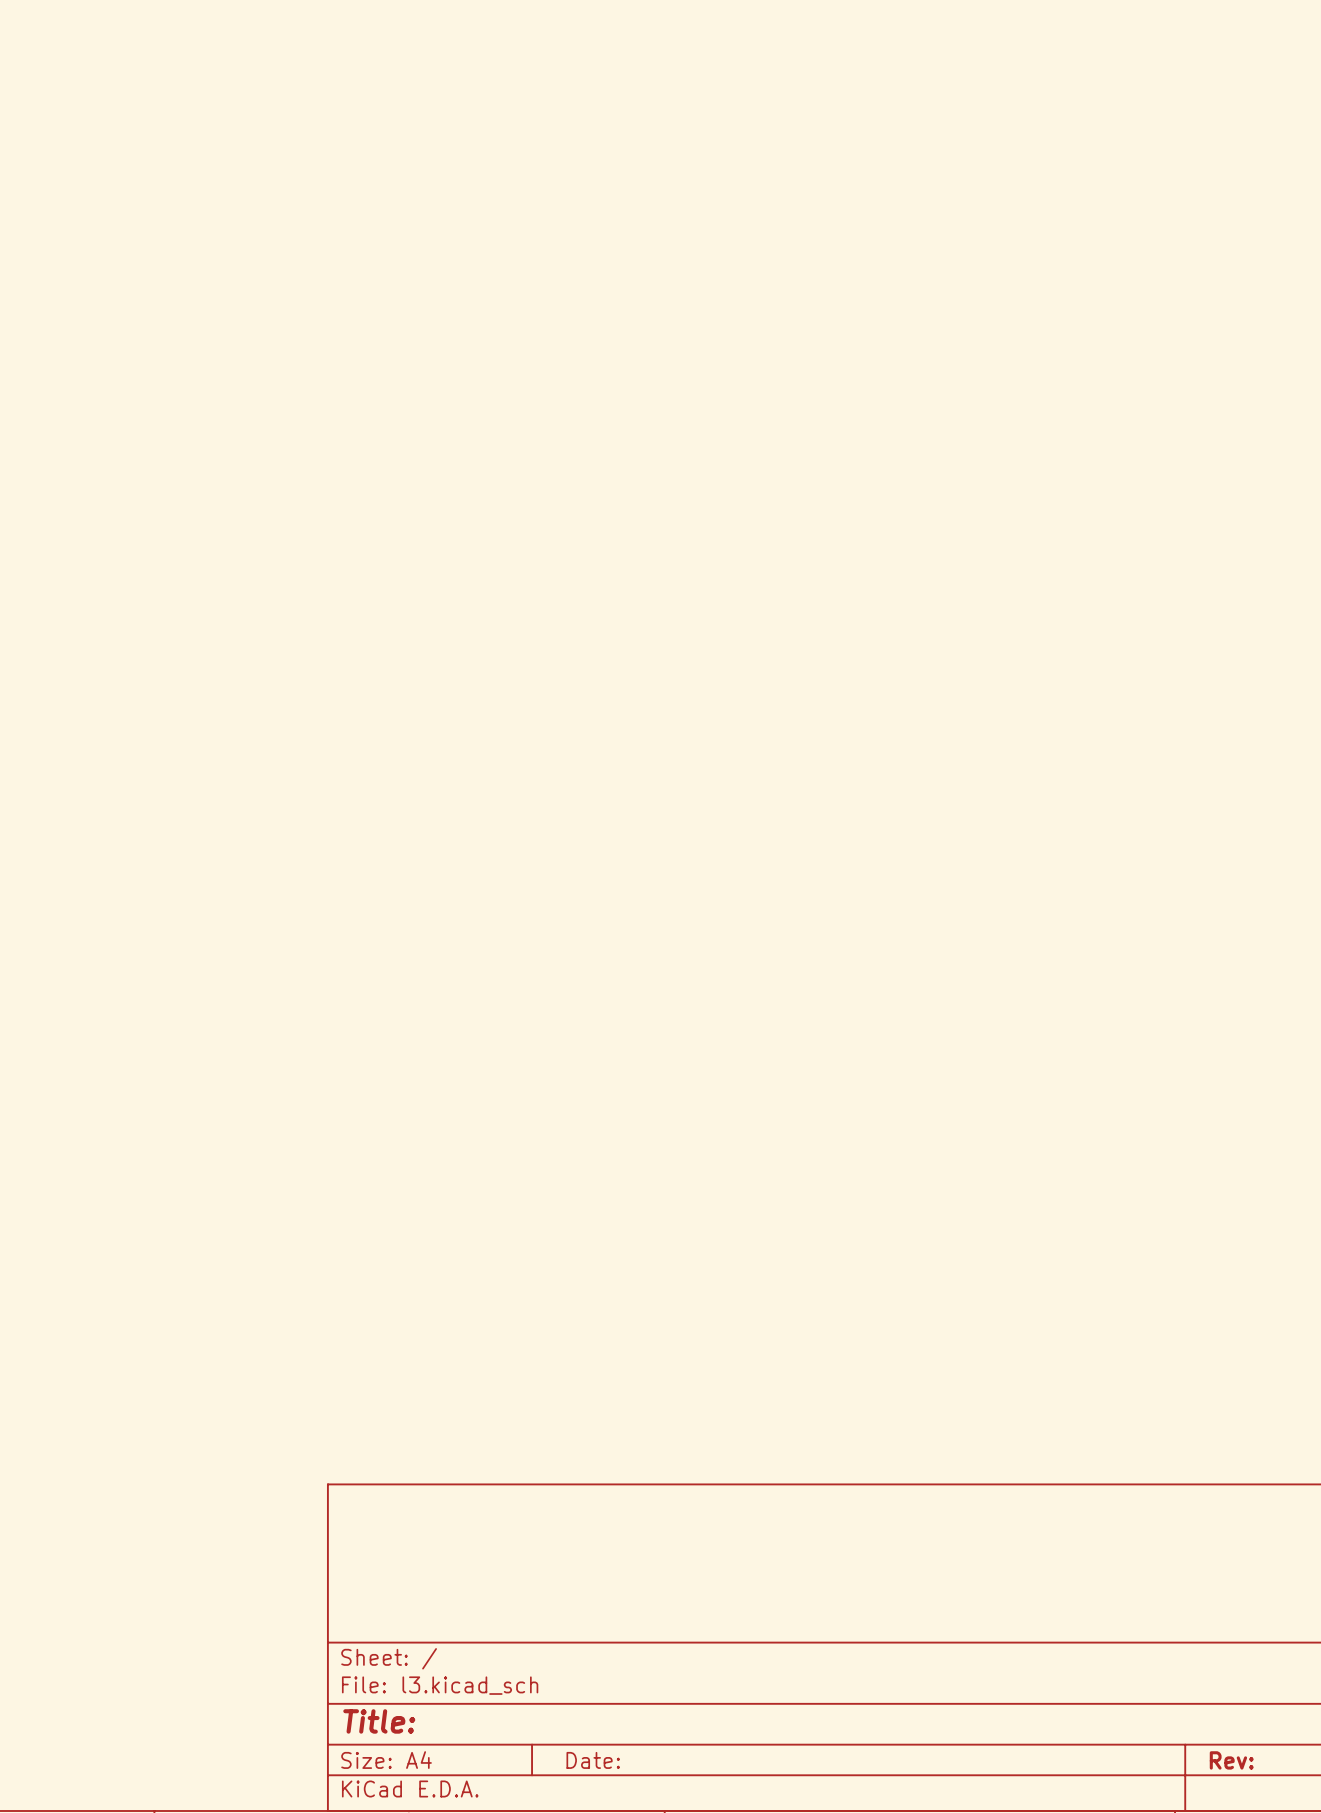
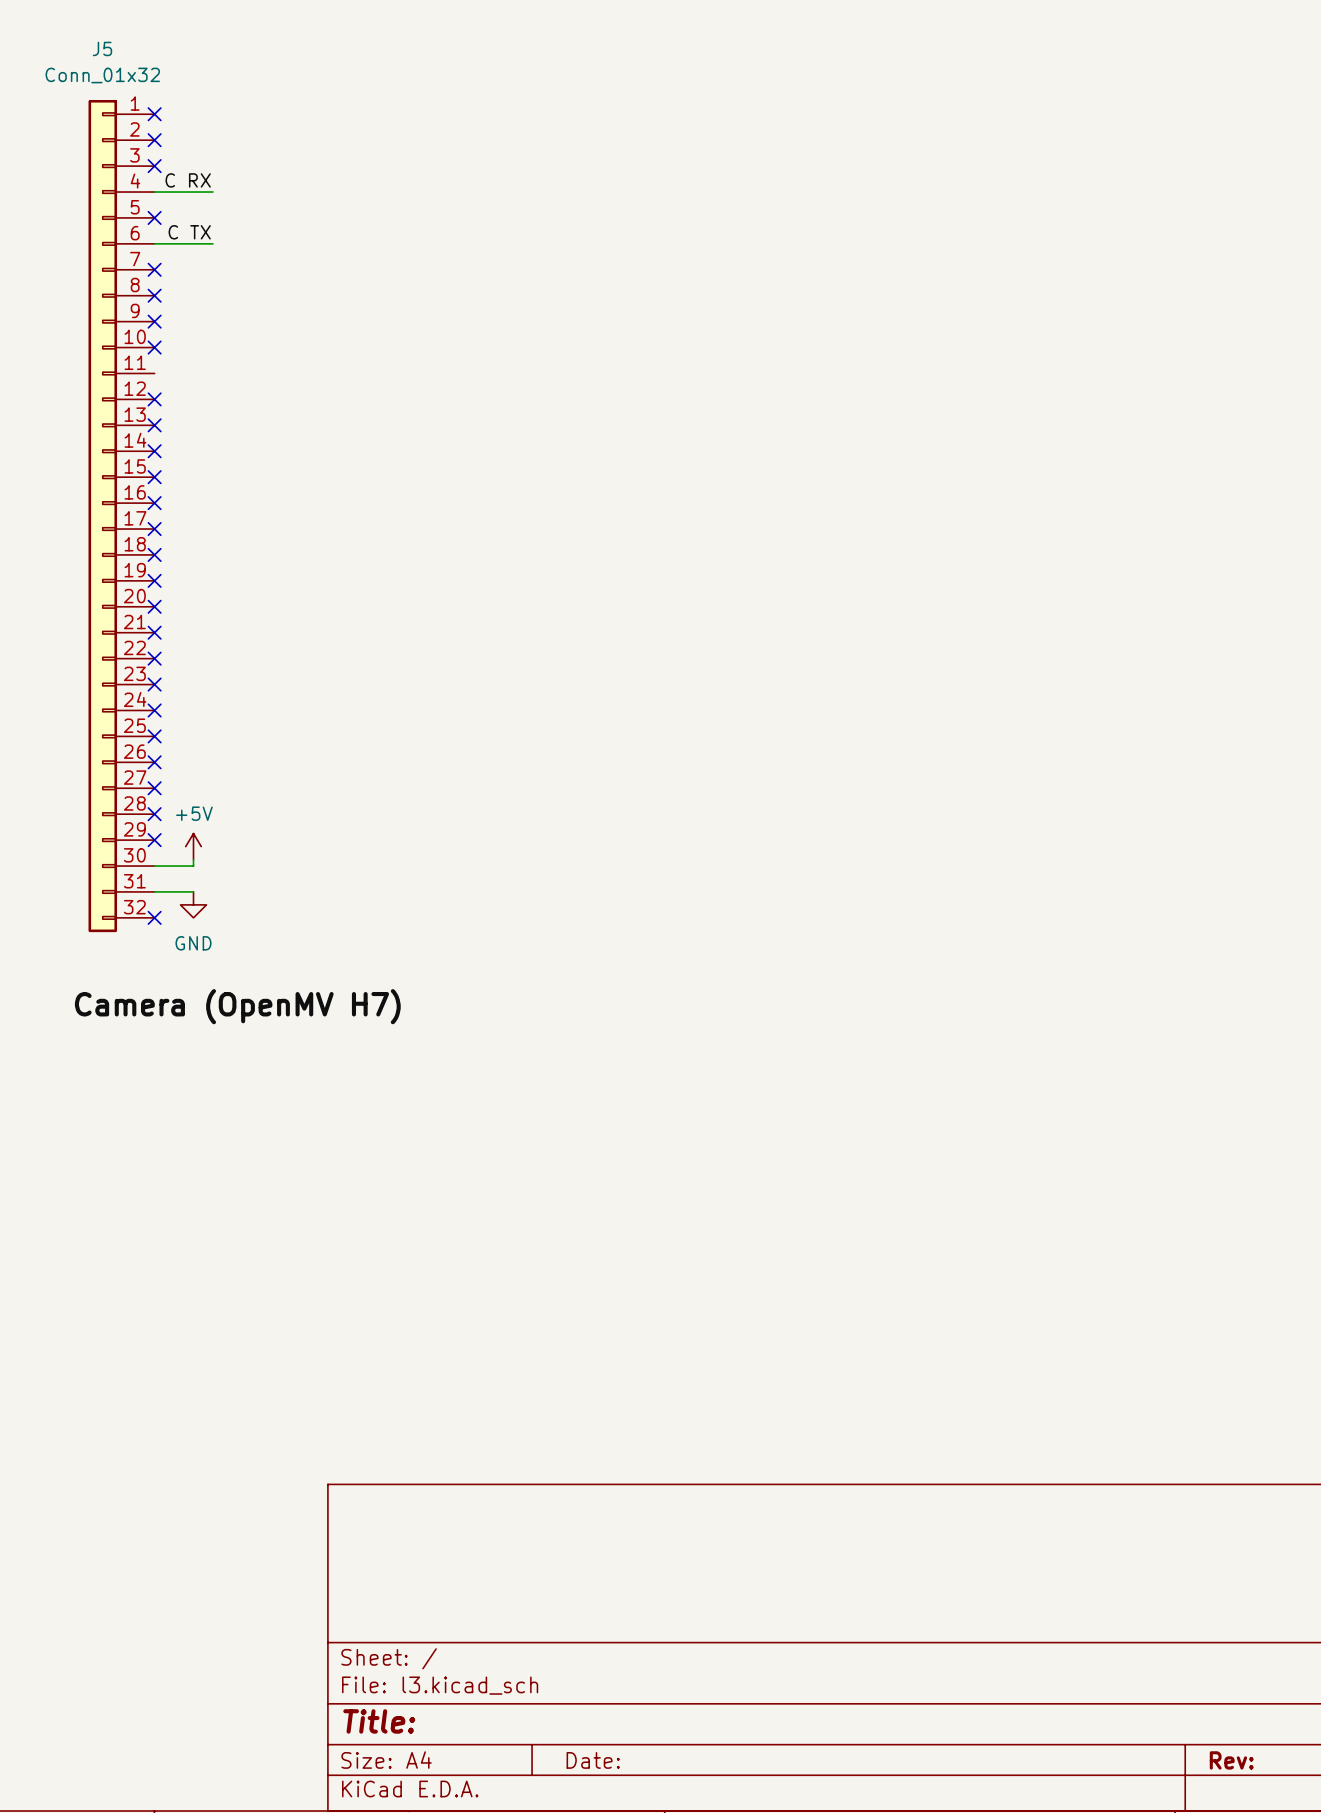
no-connect mark: none -> (154, 114)
no-connect mark: none -> (154, 140)
no-connect mark: none -> (154, 166)
label: none -> C RX (188, 180)
wire: none -> (154, 192) (212, 192)
no-connect mark: none -> (154, 217)
label: none -> C TX (189, 232)
wire: none -> (154, 243) (212, 243)
no-connect mark: none -> (154, 269)
no-connect mark: none -> (154, 295)
no-connect mark: none -> (154, 321)
no-connect mark: none -> (154, 347)
no-connect mark: none -> (154, 399)
no-connect mark: none -> (154, 425)
no-connect mark: none -> (154, 451)
no-connect mark: none -> (154, 477)
no-connect mark: none -> (154, 503)
J5: none -> Conn_01x32 (121, 516)
no-connect mark: none -> (154, 529)
no-connect mark: none -> (154, 554)
no-connect mark: none -> (154, 580)
no-connect mark: none -> (154, 606)
no-connect mark: none -> (154, 632)
no-connect mark: none -> (154, 658)
no-connect mark: none -> (154, 684)
no-connect mark: none -> (154, 710)
no-connect mark: none -> (154, 736)
no-connect mark: none -> (154, 762)
no-connect mark: none -> (154, 788)
no-connect mark: none -> (154, 814)
no-connect mark: none -> (154, 840)
power symbol: none -> +5V (193, 846)
wire: none -> (193, 859) (193, 866) (154, 866)
wire: none -> (154, 891) (193, 891)
power symbol: none -> GND (193, 904)
no-connect mark: none -> (154, 917)
label: none -> Camera (OpenMV H7) (237, 1006)

